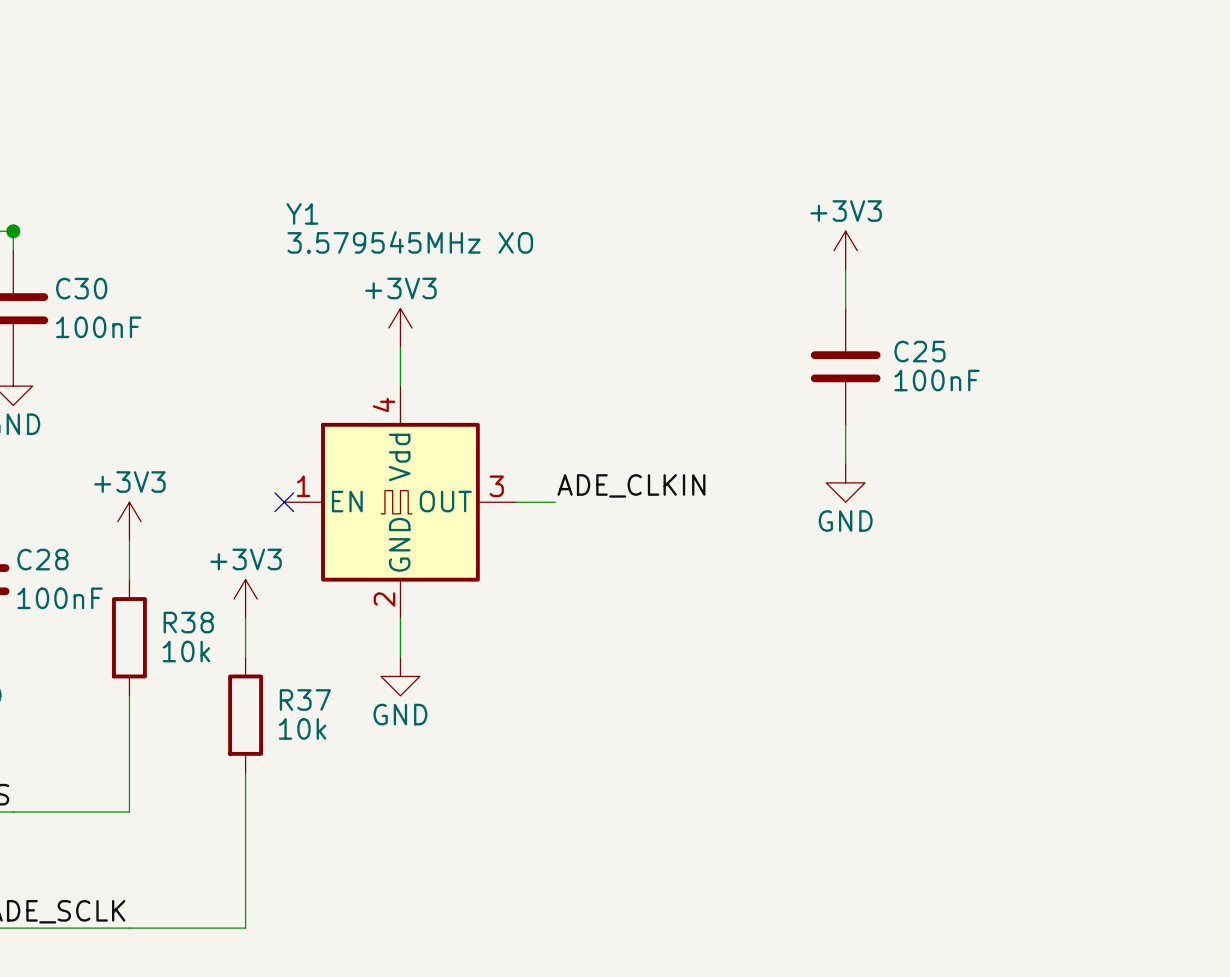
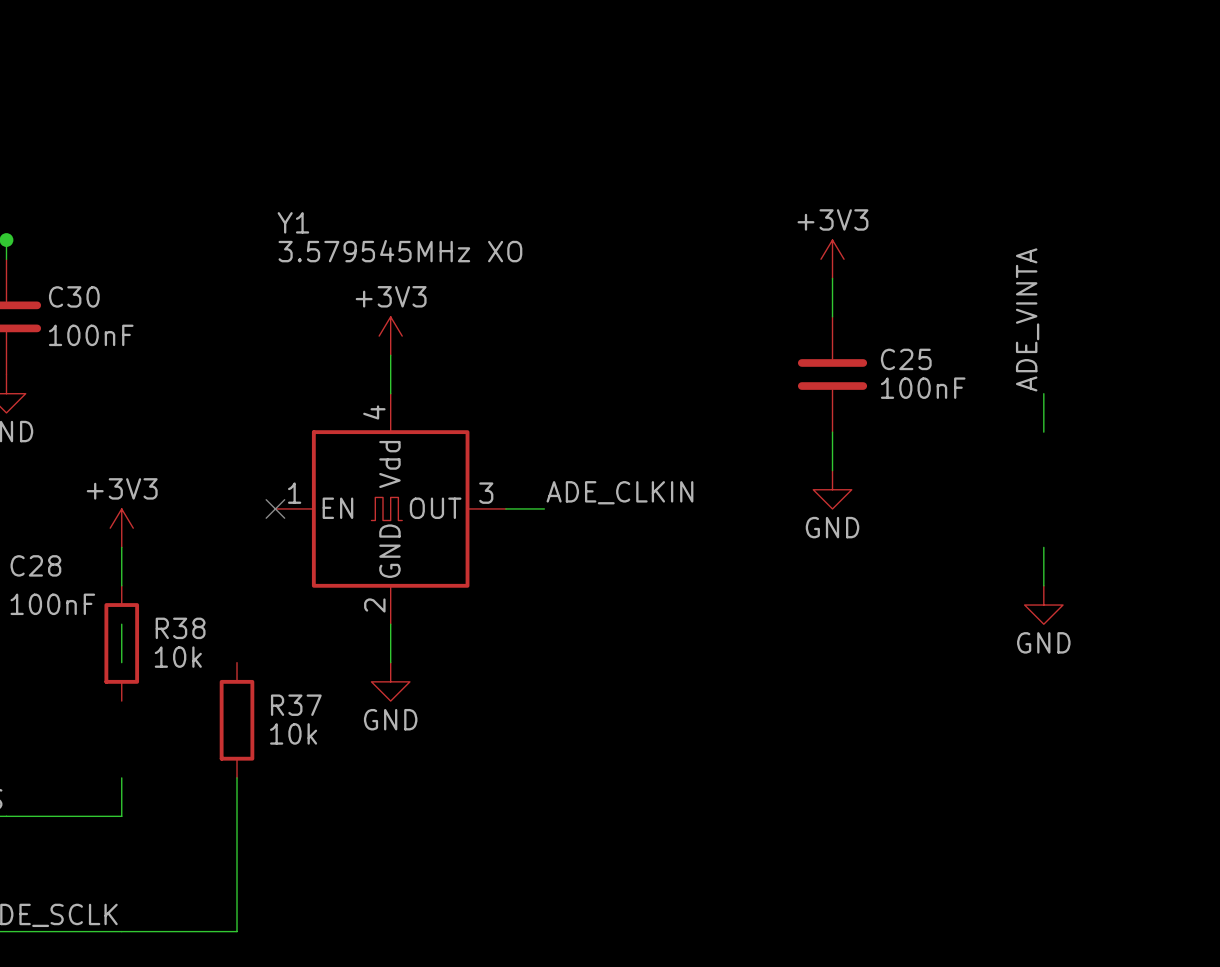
label: none -> ADE_VINTA (1027, 319)
wire: none -> (1043, 393) (1043, 432)
wire: none -> (1043, 547) (1043, 585)
power symbol: +3V3 (245, 599) -> none
power symbol: none -> GND (1043, 605)
wire: (245, 618) (245, 657) -> (121, 624) (121, 662)
wire: (129, 695) (129, 773) -> none

